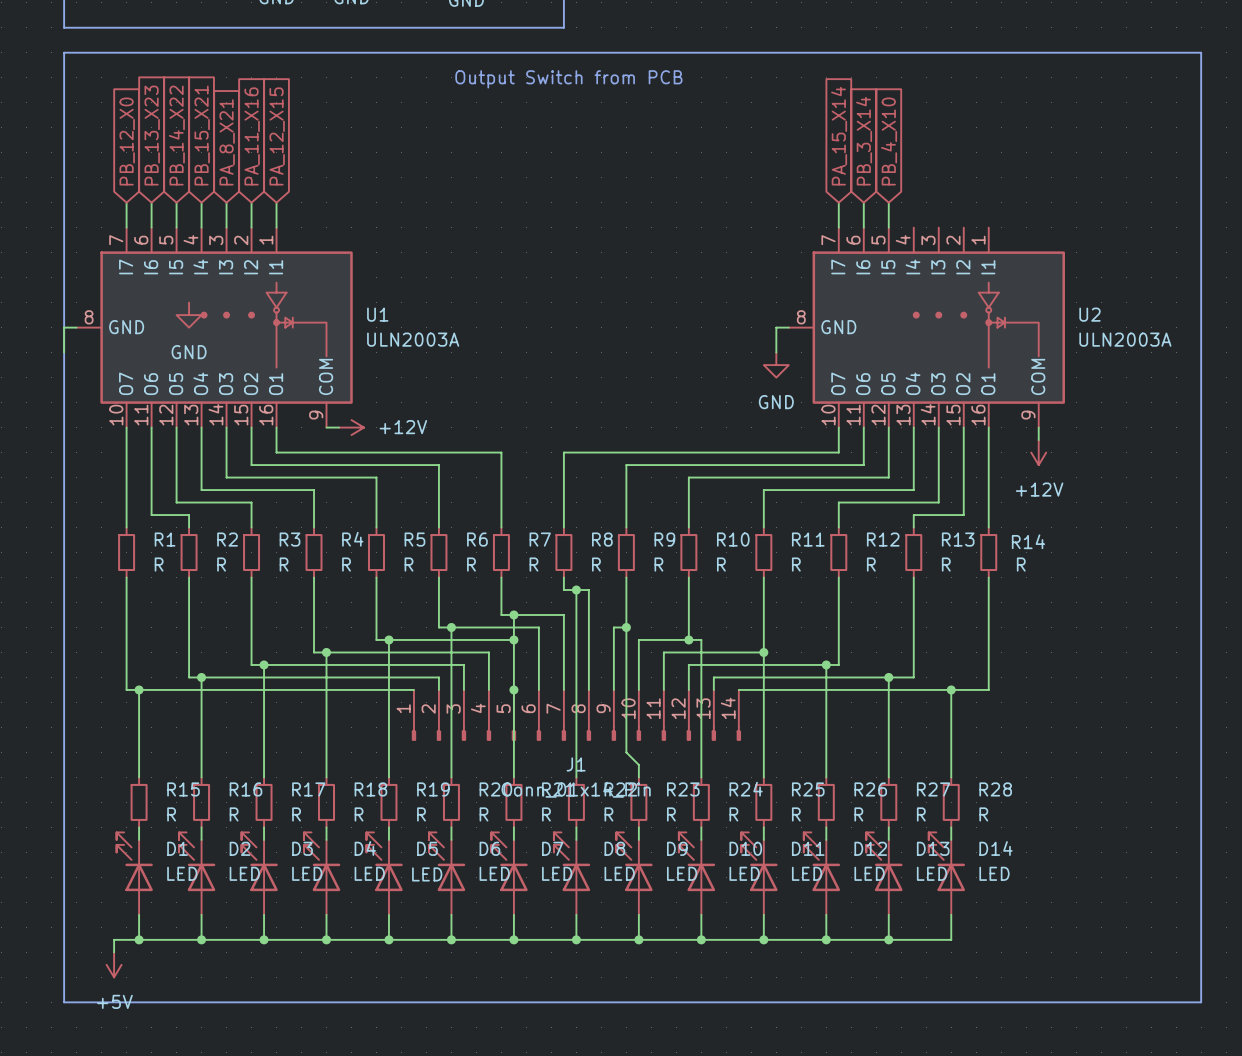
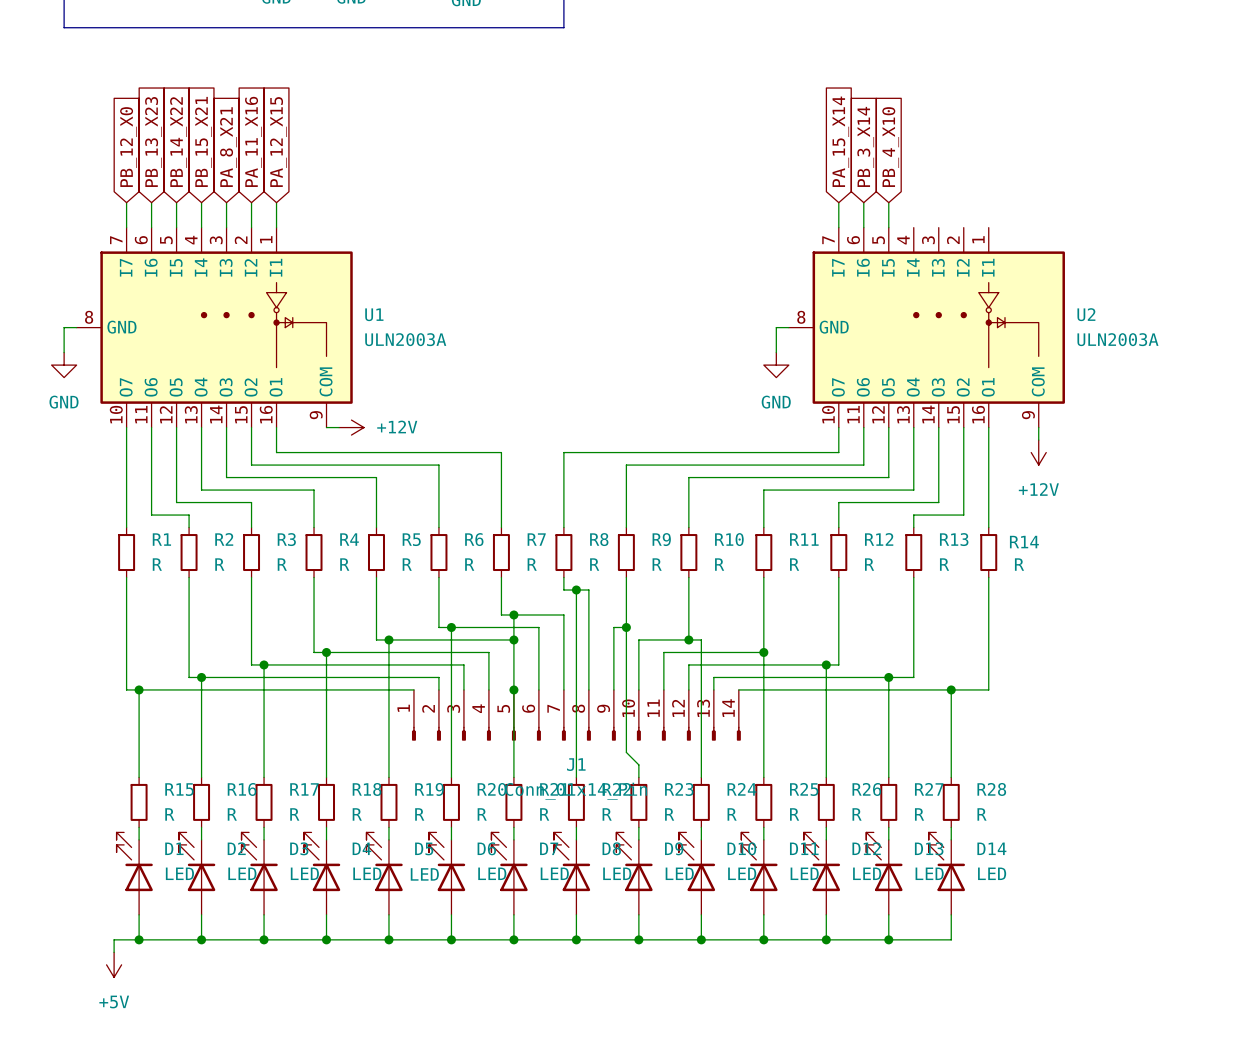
line: (64, 52) (1201, 52) (1201, 1002) (64, 1002) (64, 52) -> none
text: Output Switch from PCB (568, 79) -> none
power symbol position: GND (189, 315) -> GND (64, 365)

